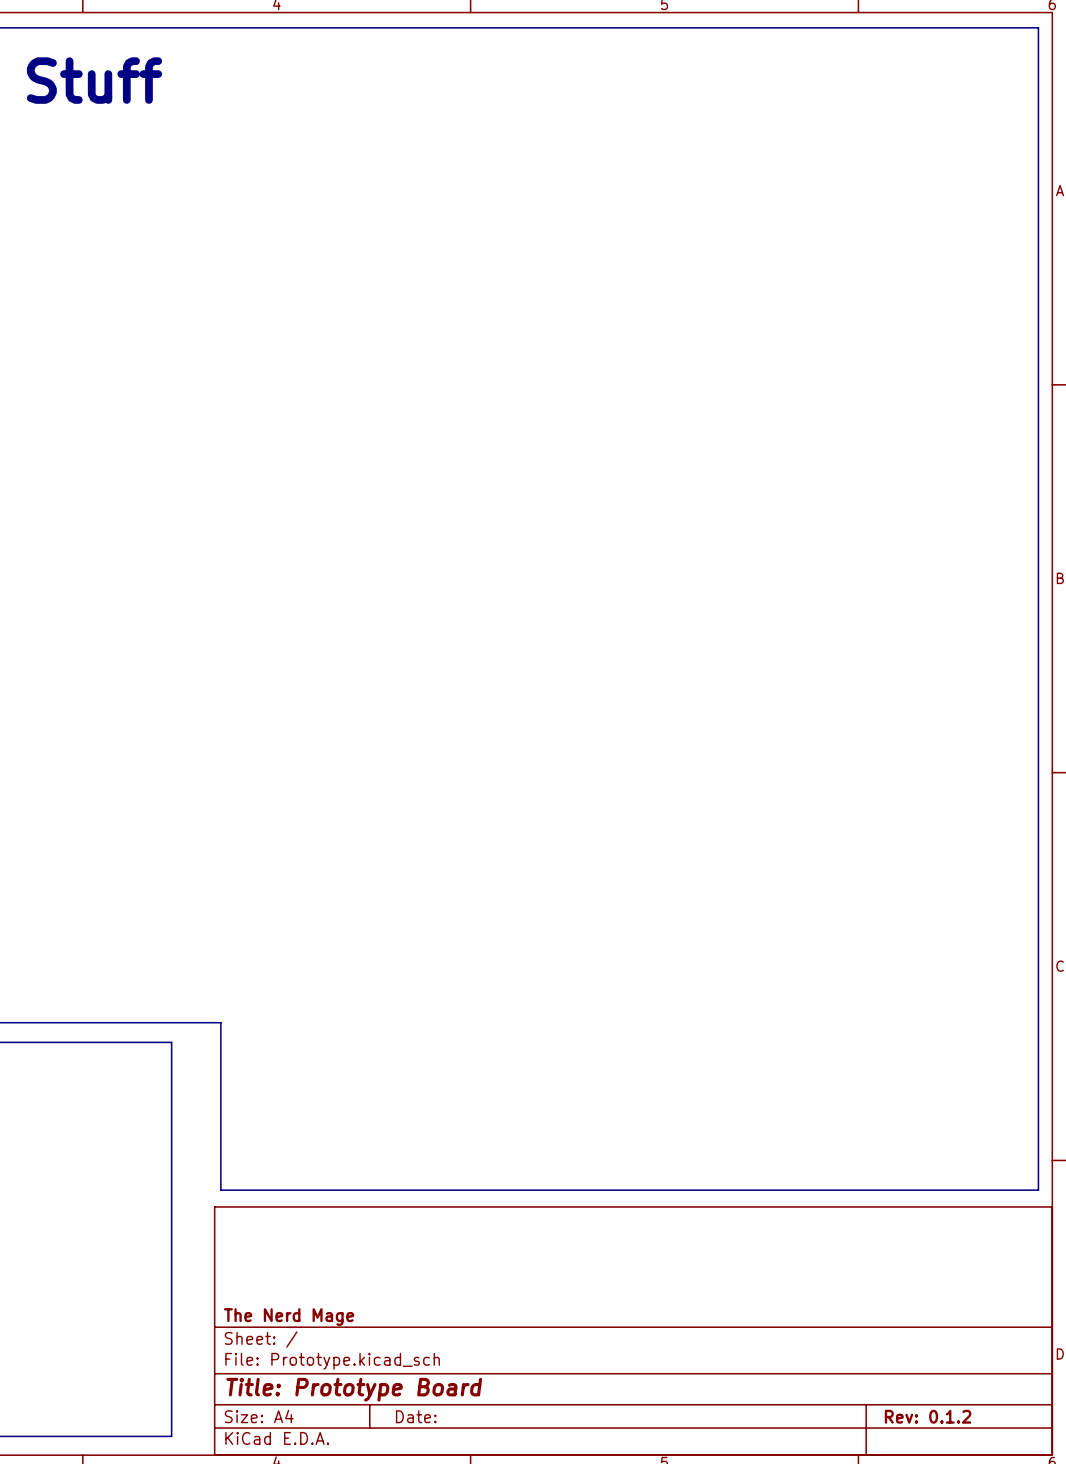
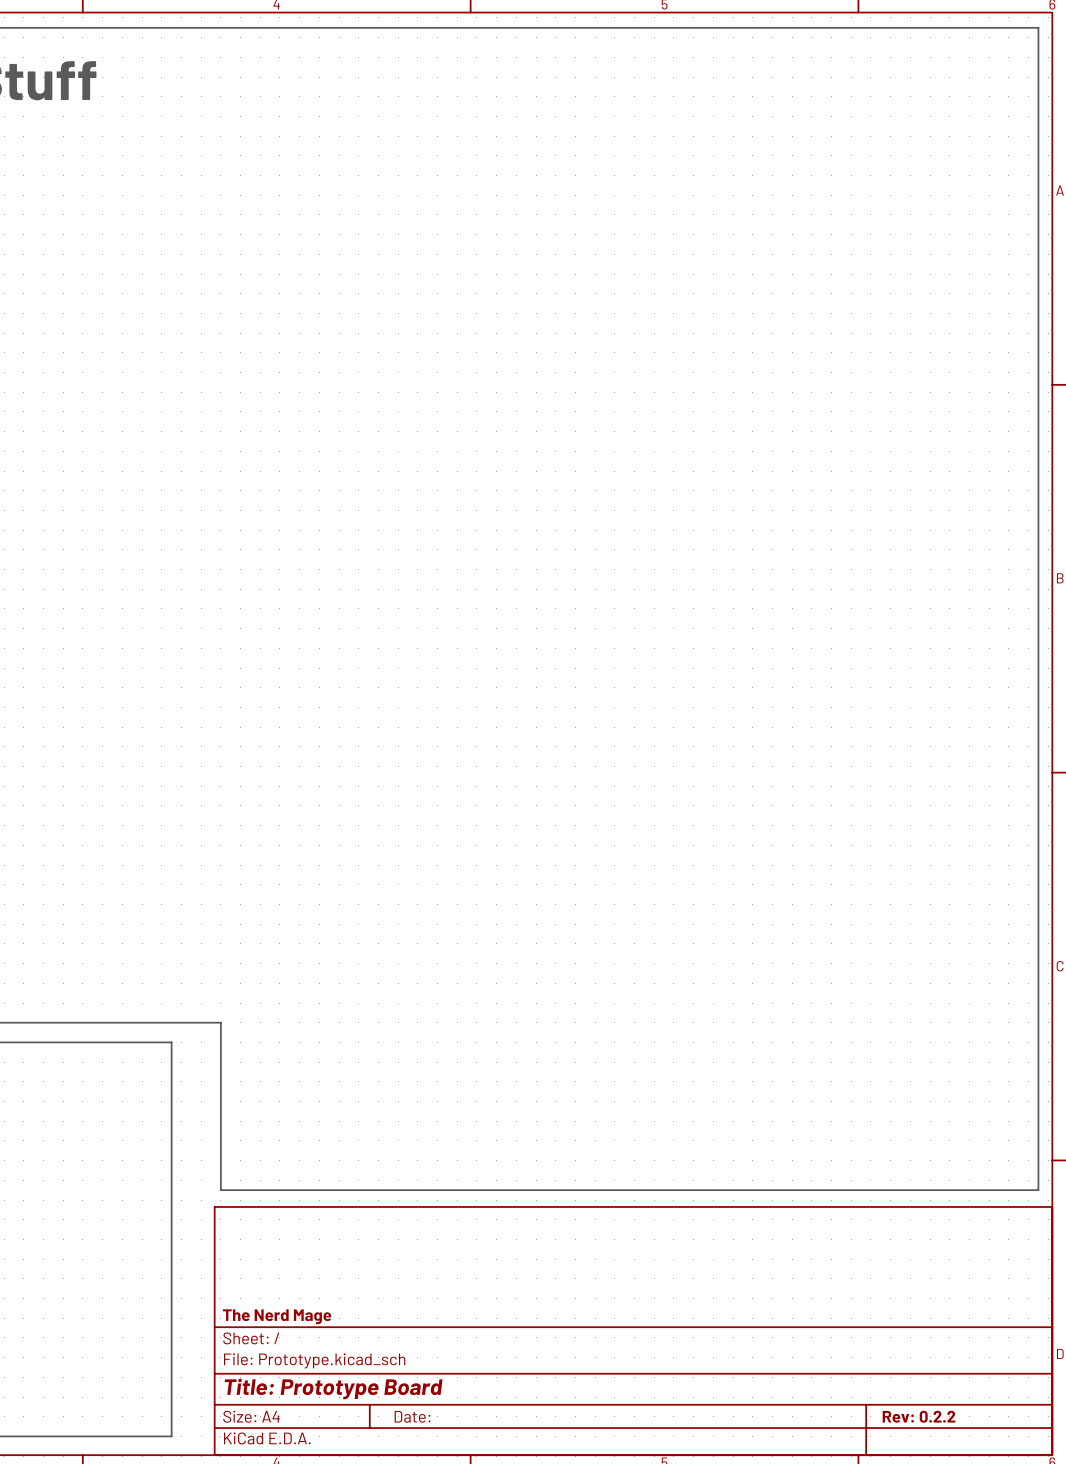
title block: Rev: 0.1.2 (928, 1416) -> Rev: 0.2.2 (919, 1416)

